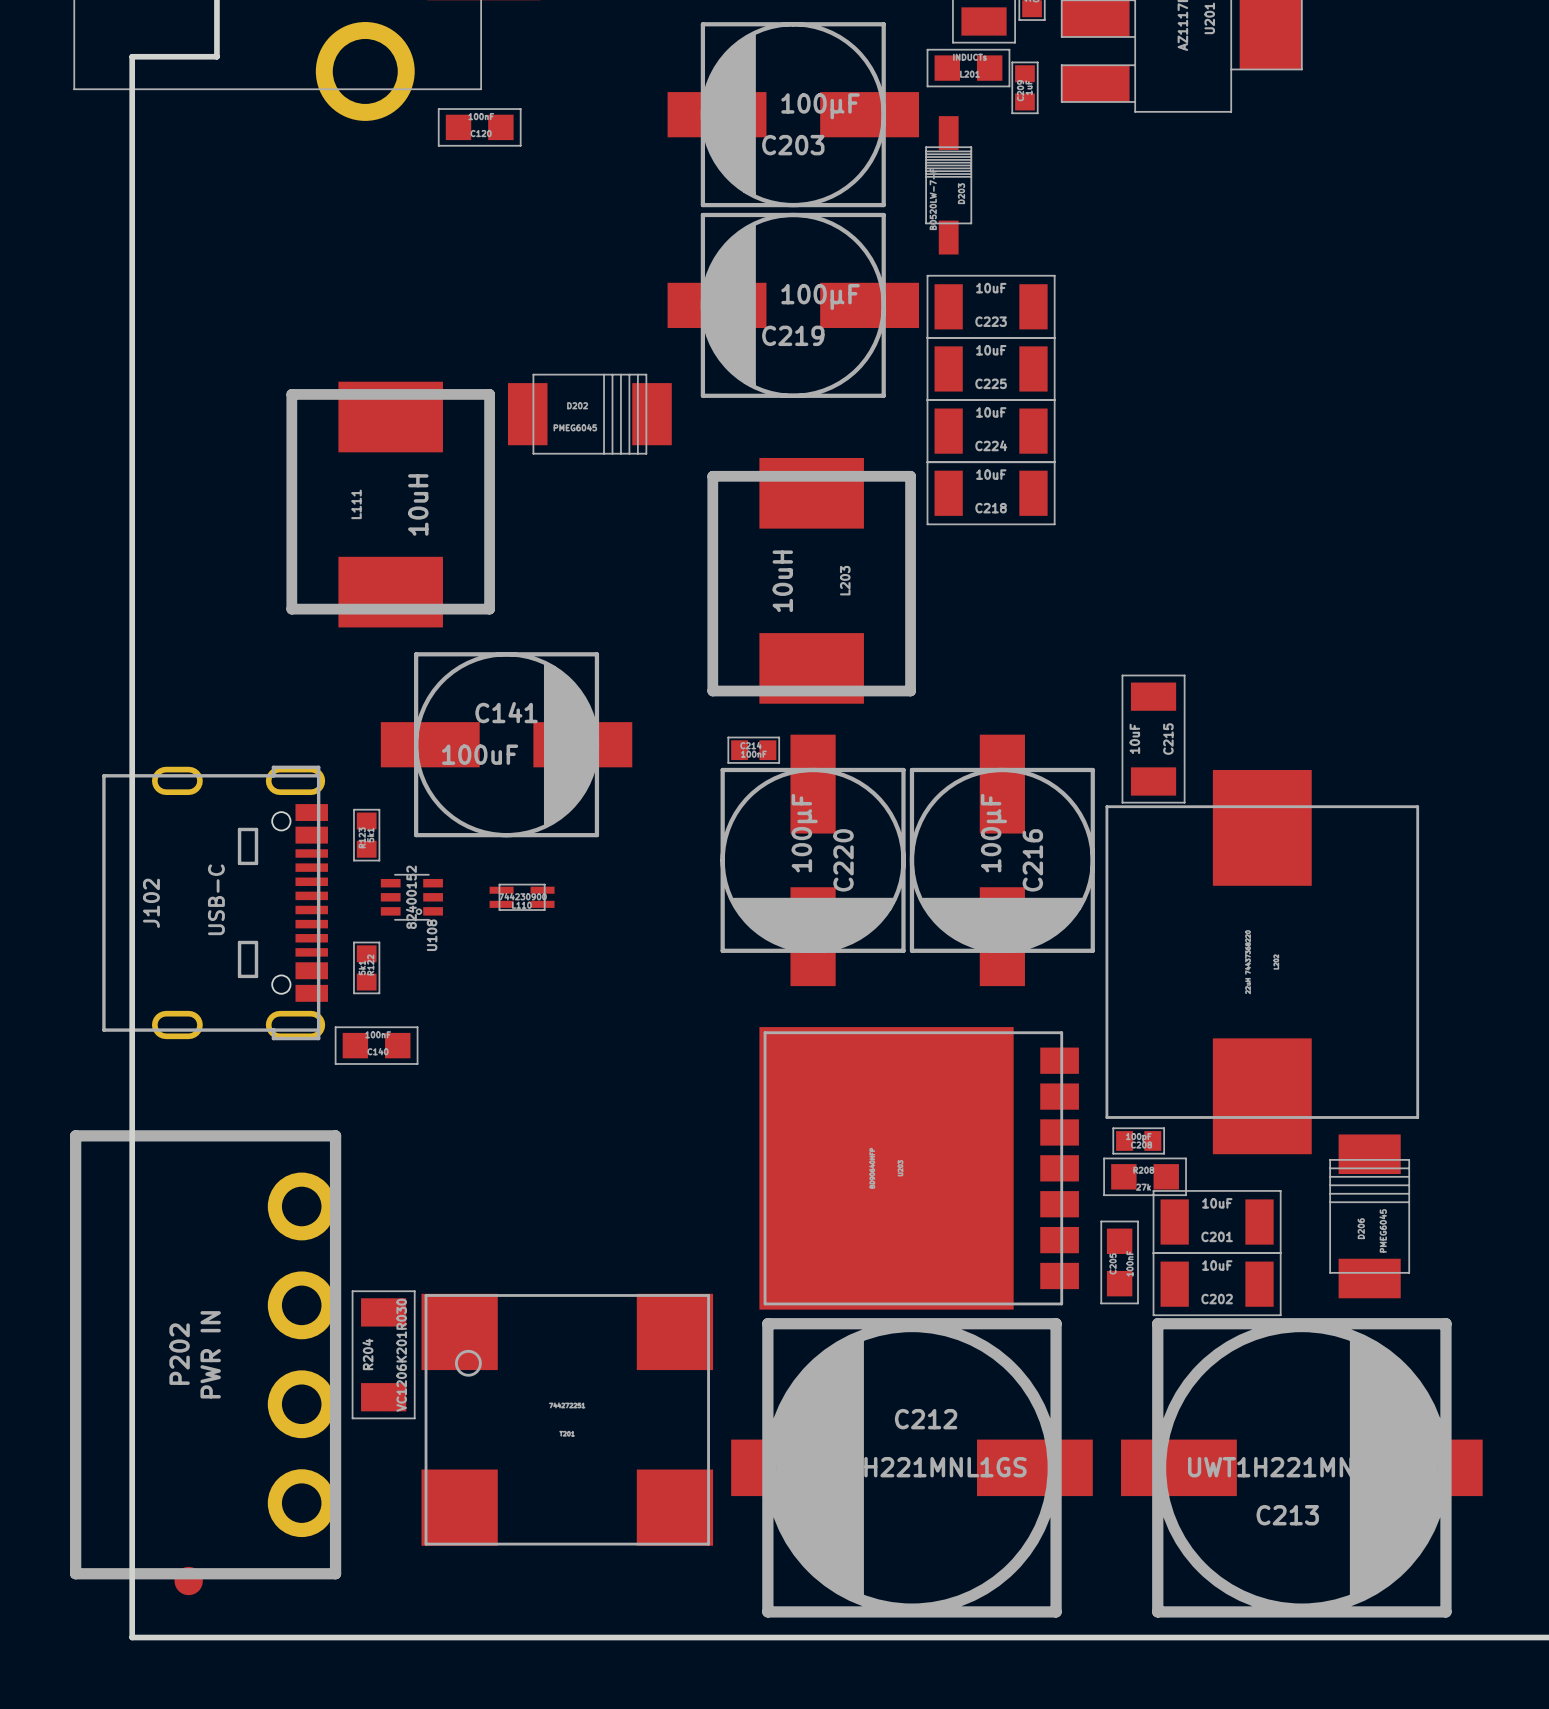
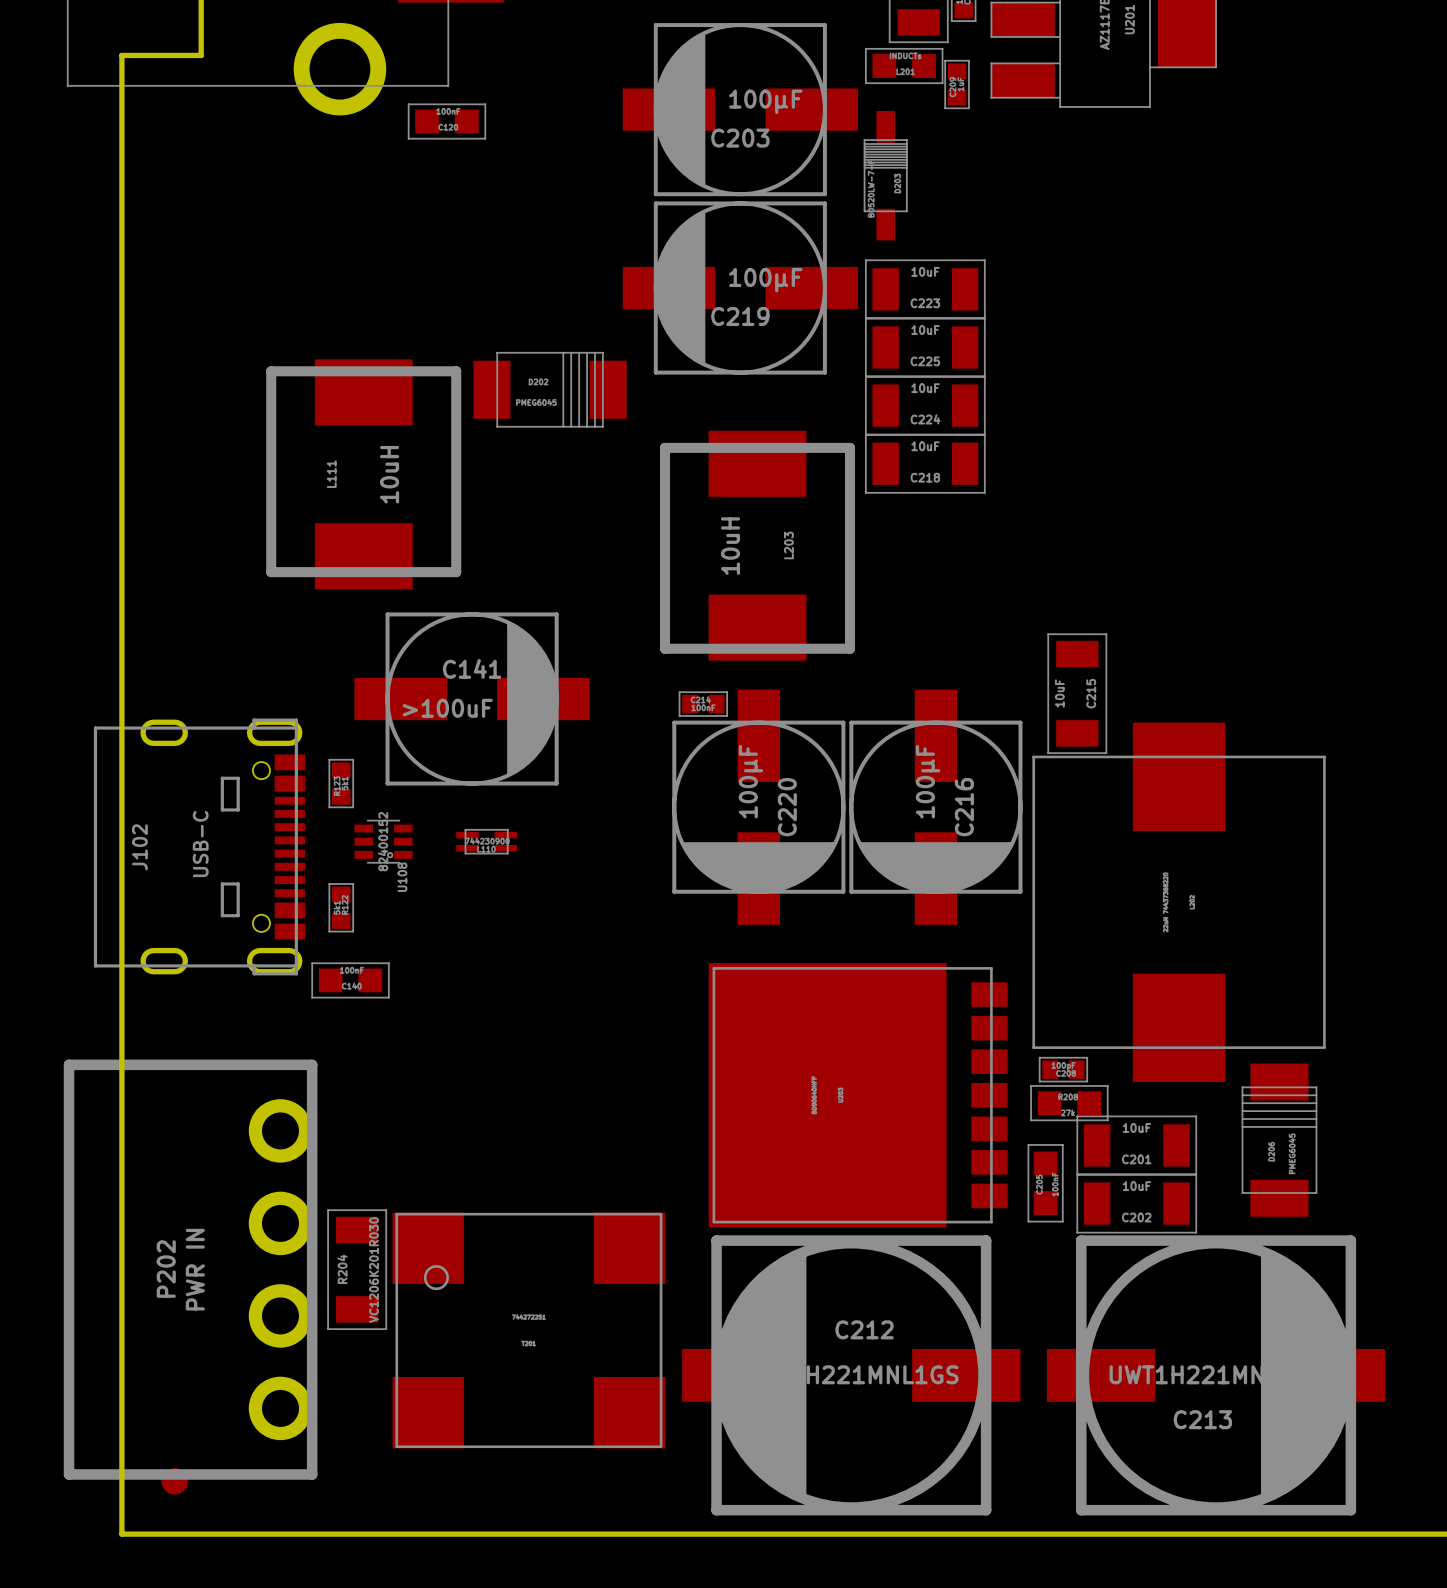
C141 value: 100uF (480, 754) -> >100uF (447, 708)

